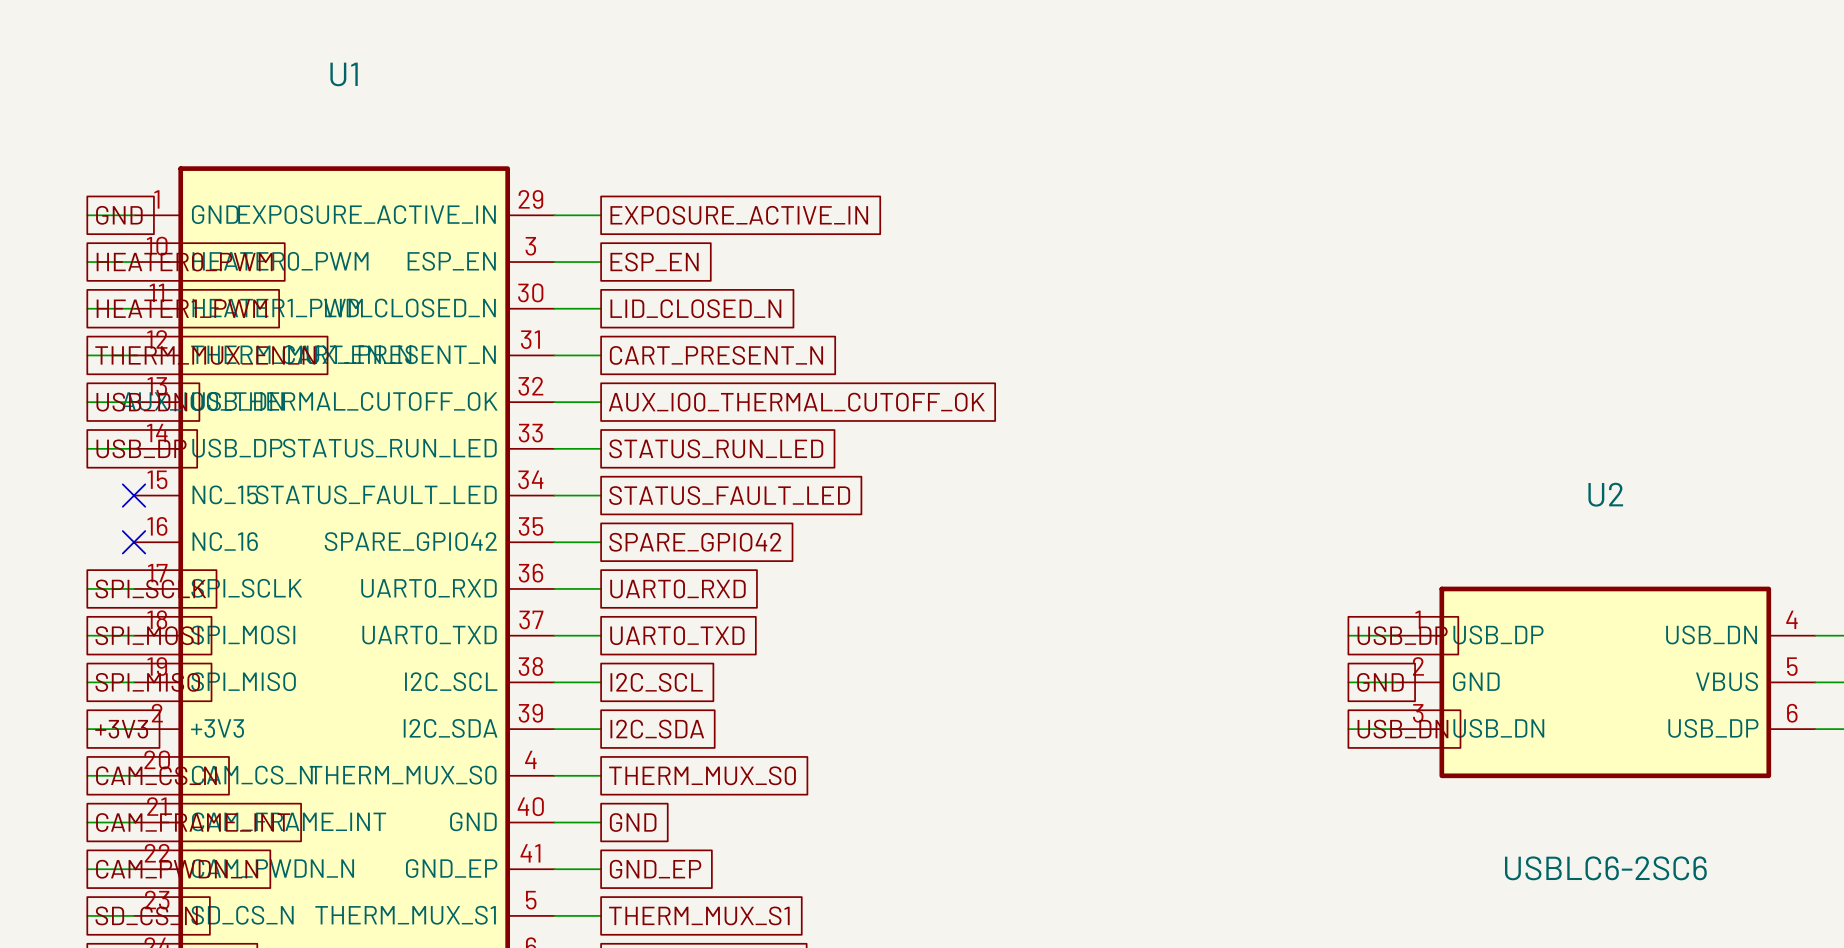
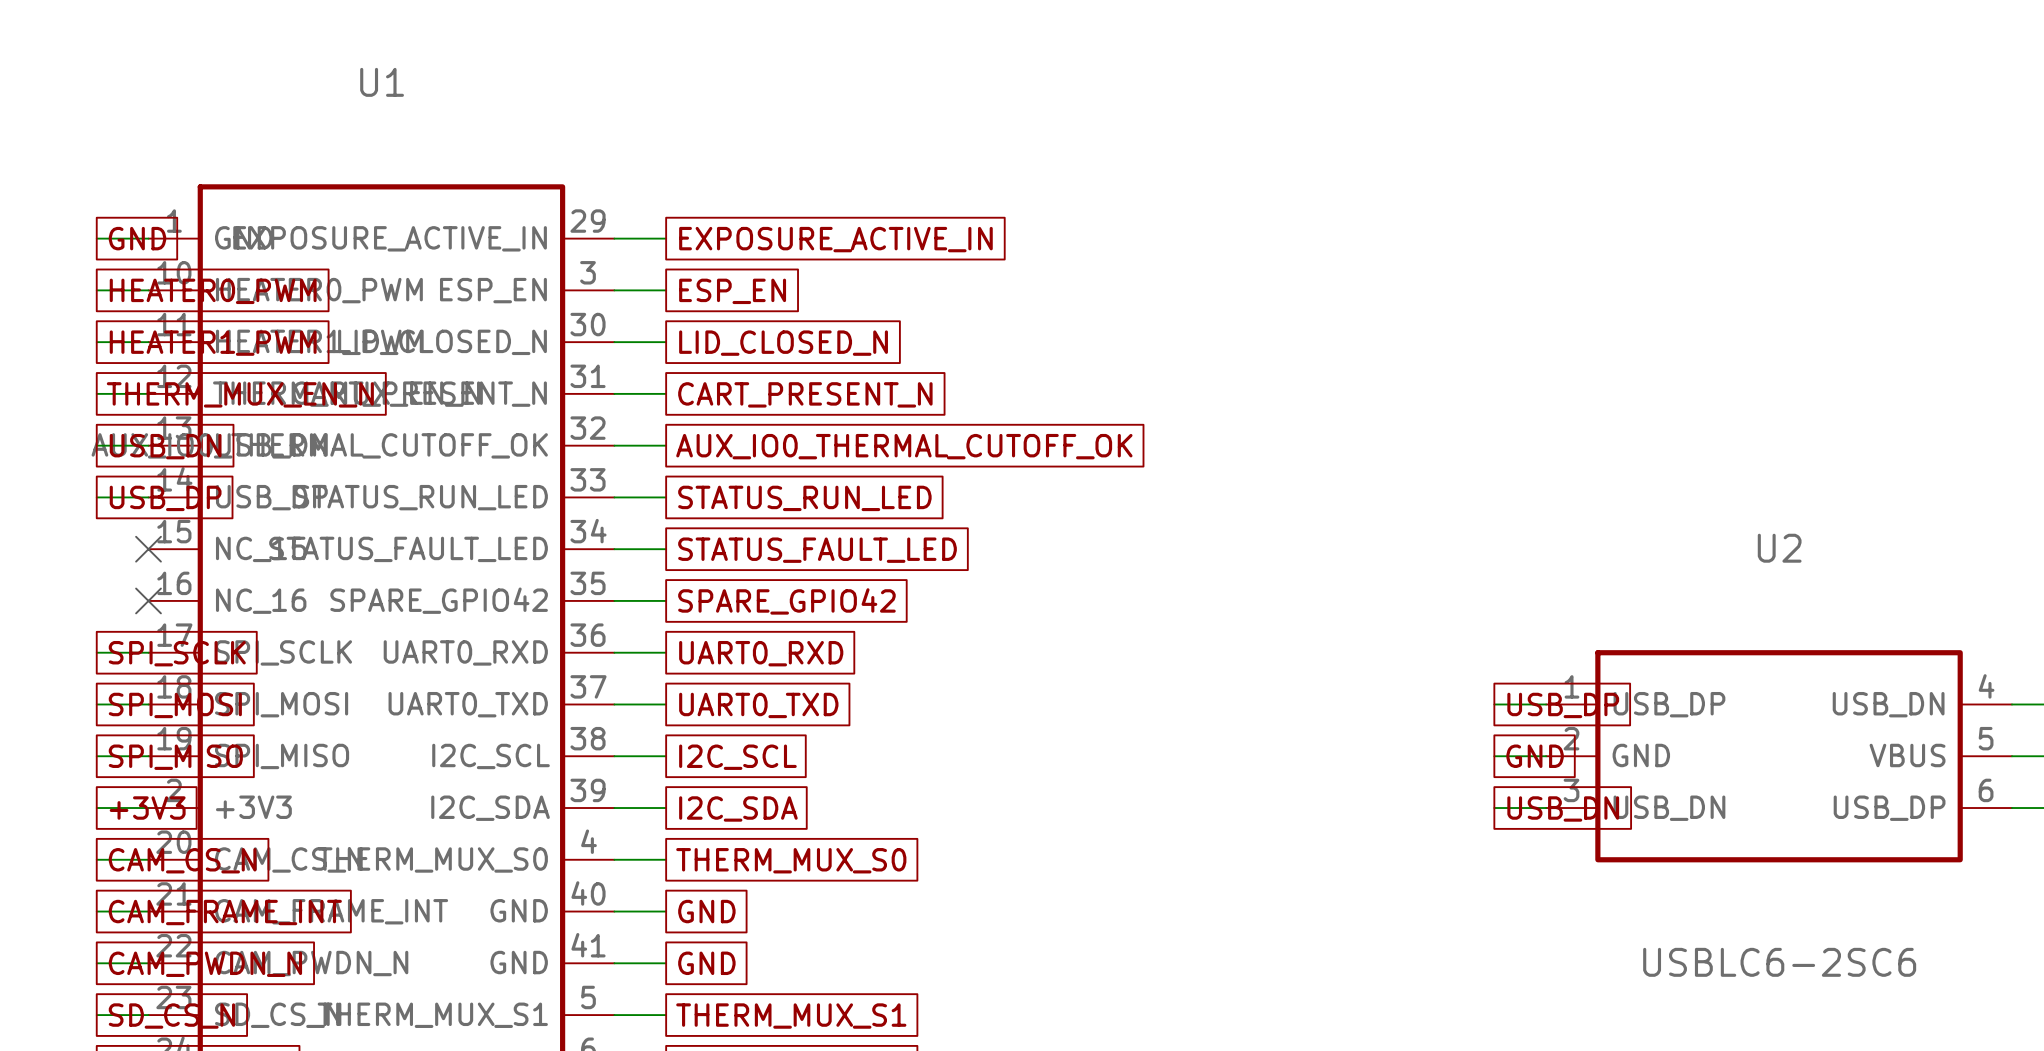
U1 pin name: GND_EP (451, 868) -> GND (519, 962)
global label: GND_EP (655, 869) -> GND (706, 963)

